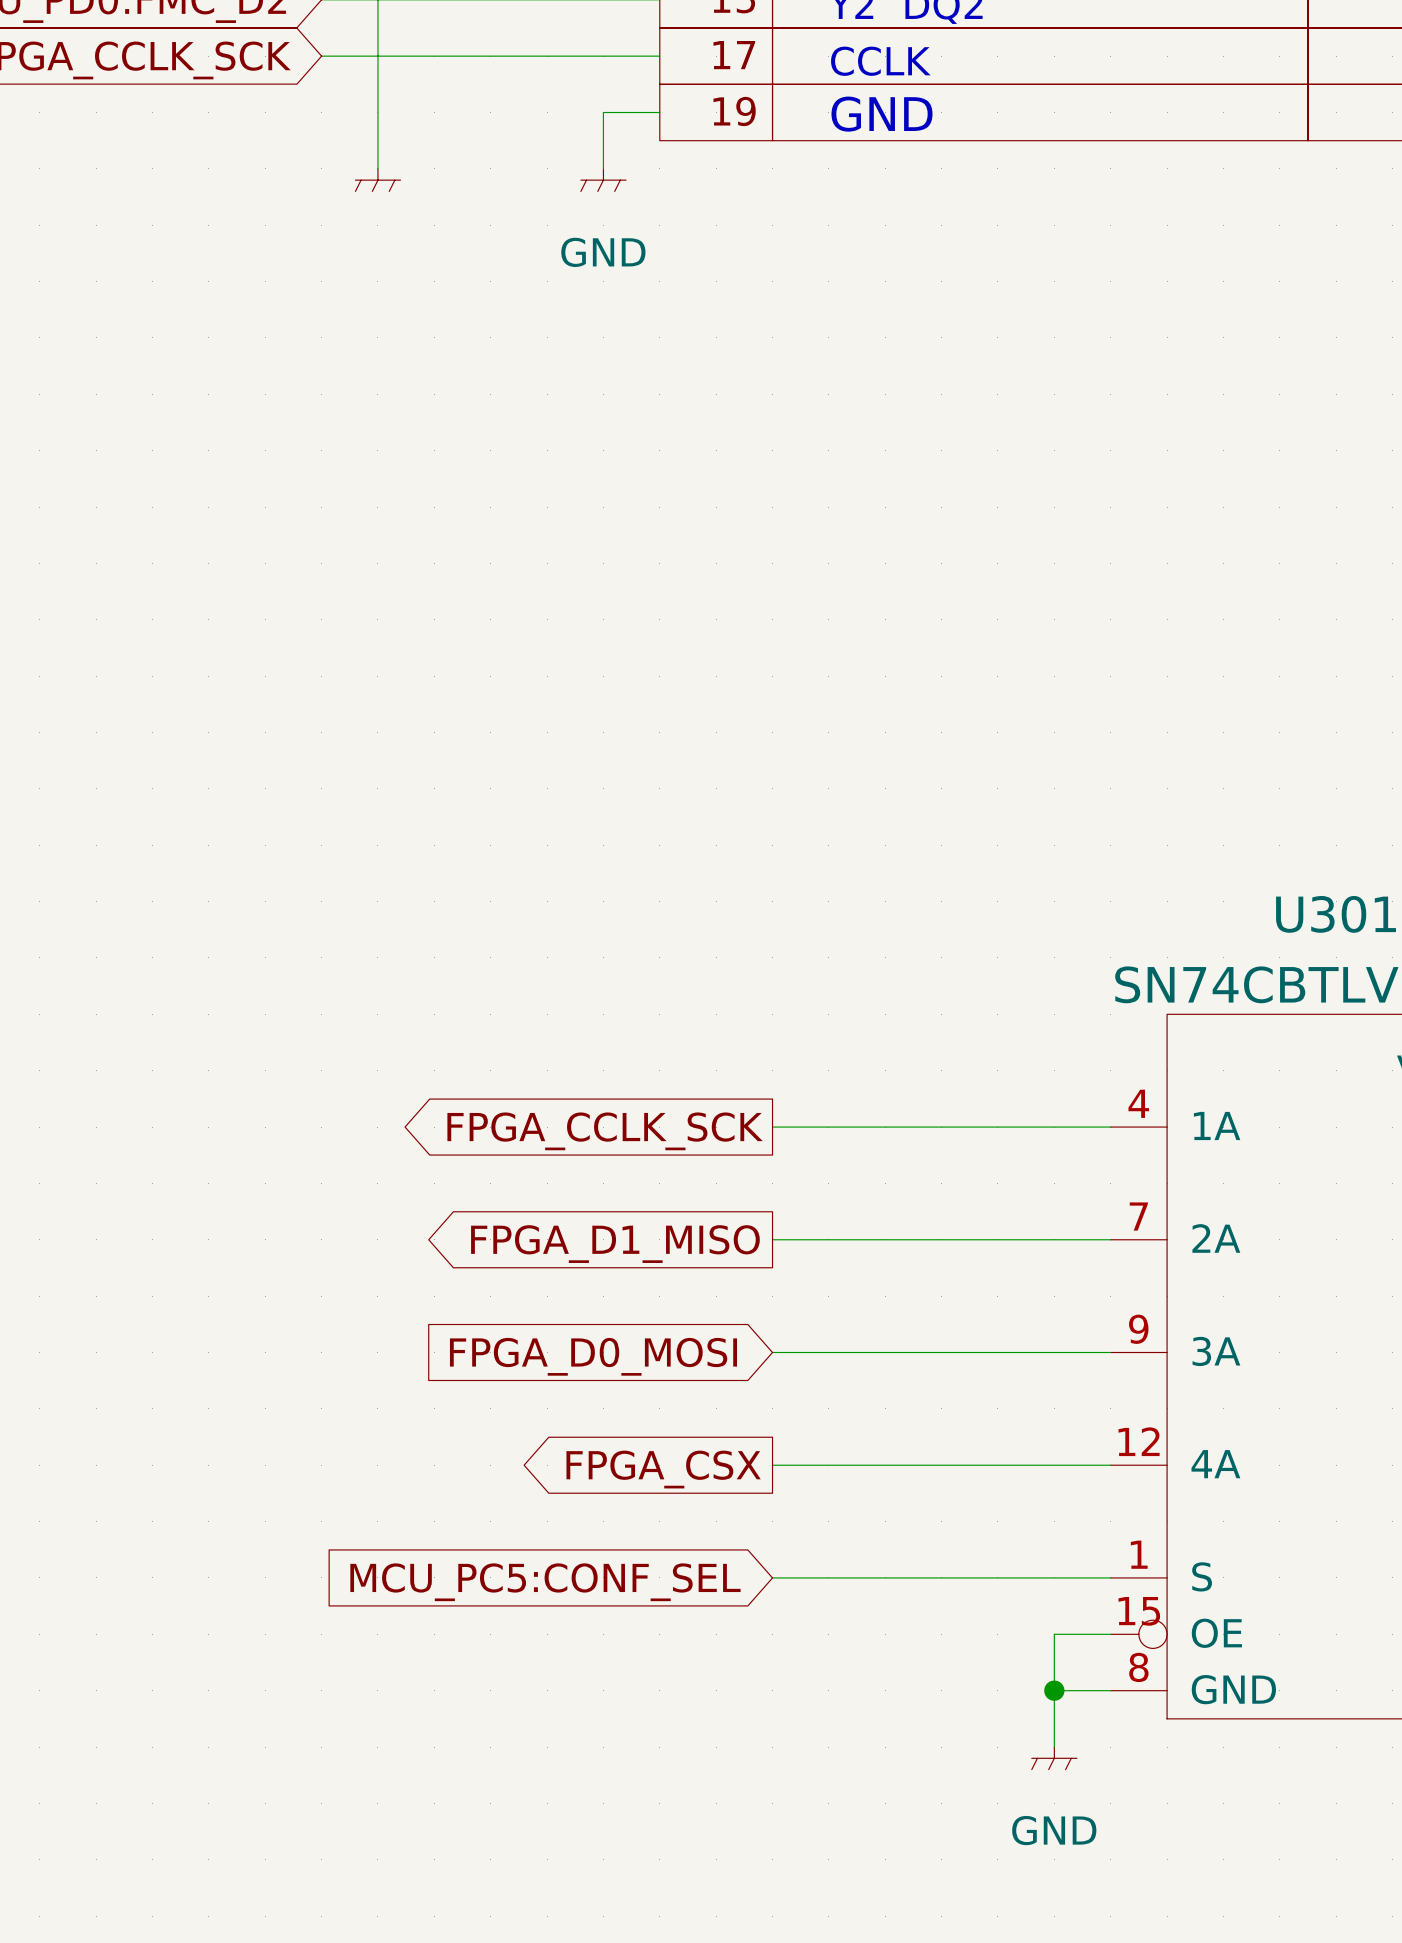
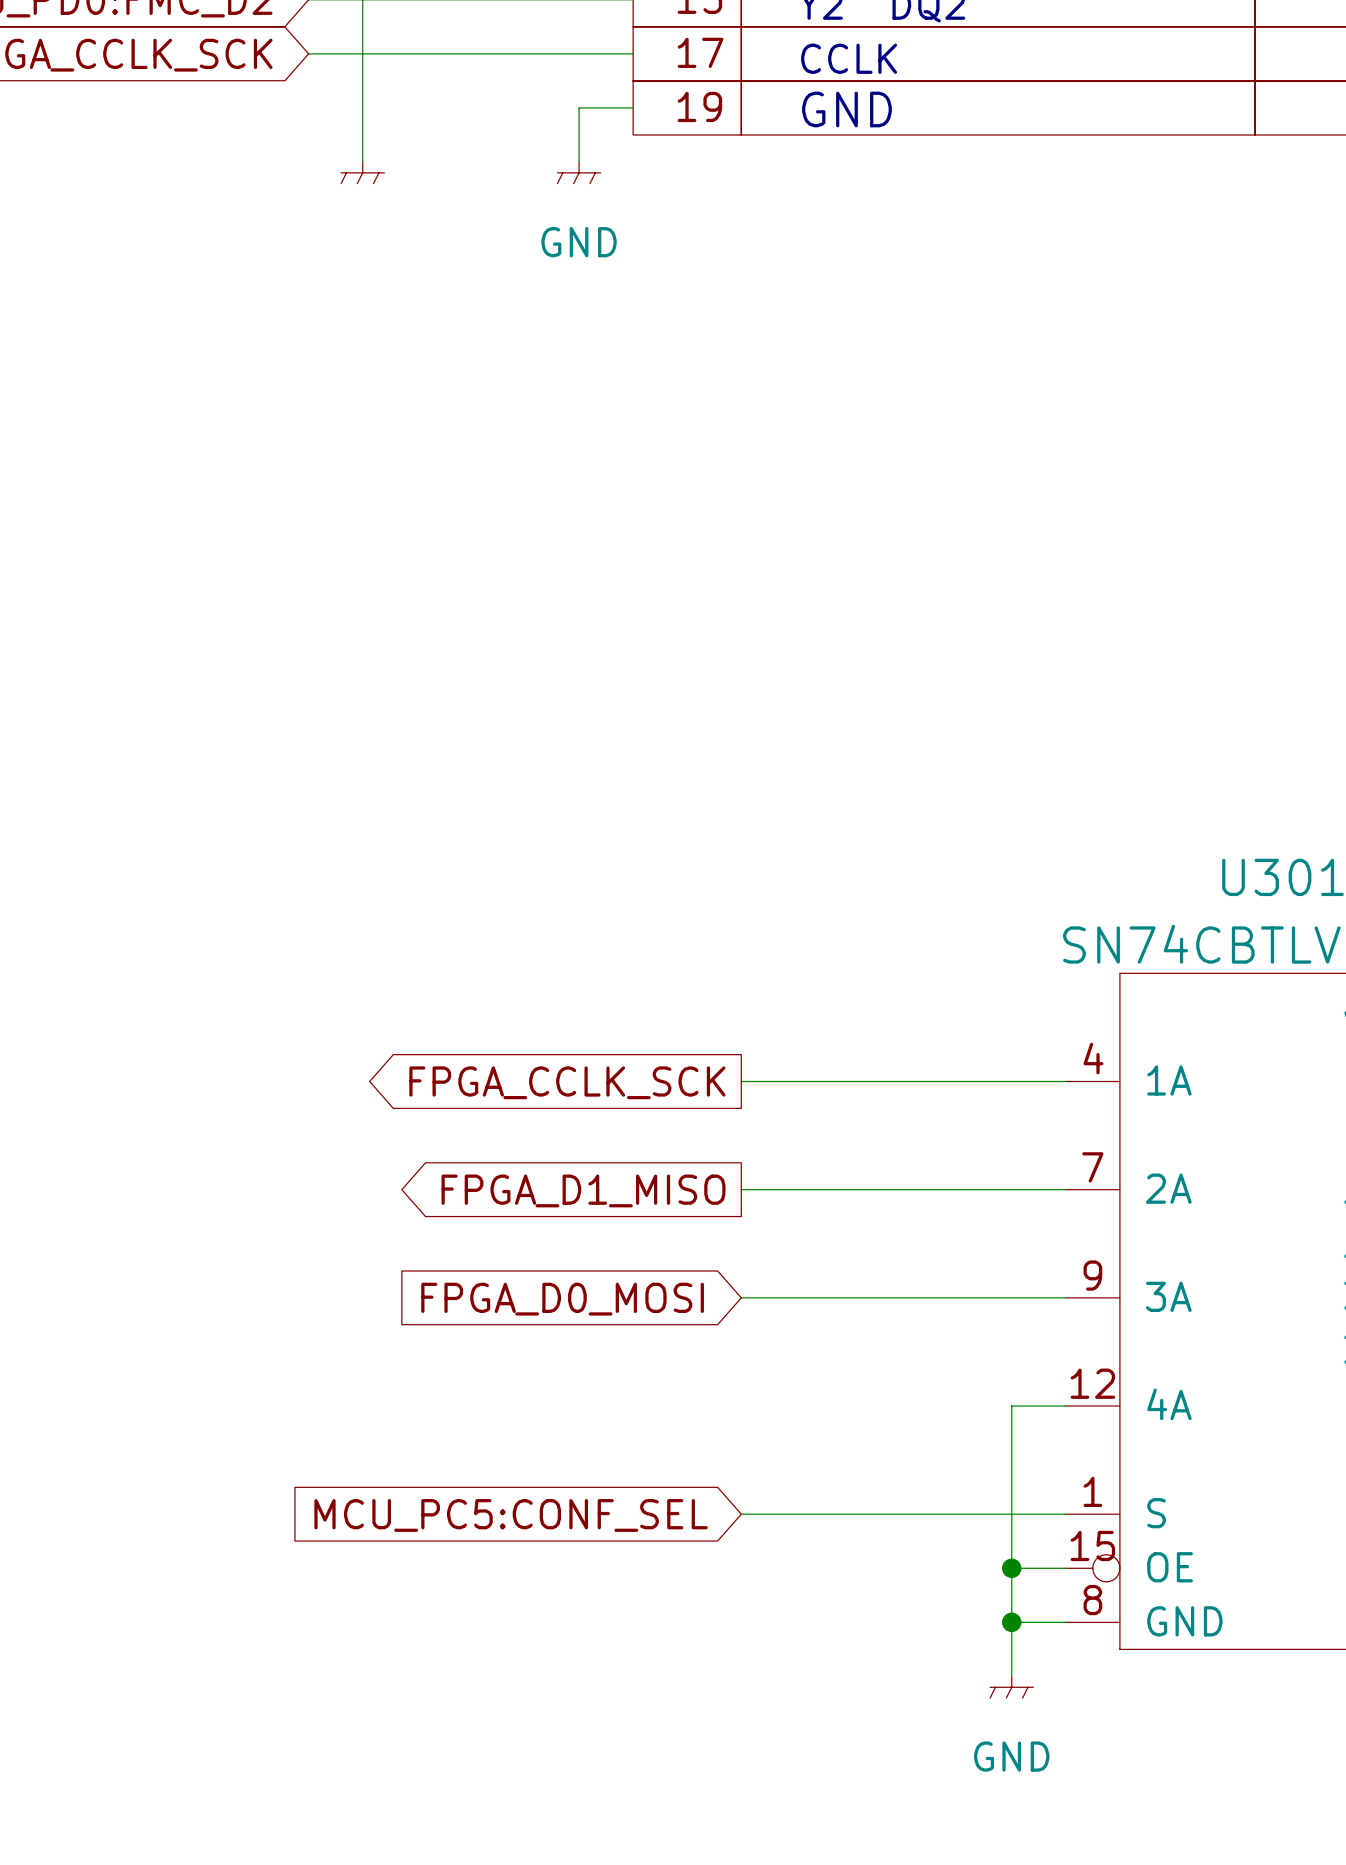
wire: (772, 1465) (1054, 1465) -> (1011, 1568) (1011, 1406)
global label: FPGA_CSX (663, 1469) -> none
junction: none -> (1011, 1568)

